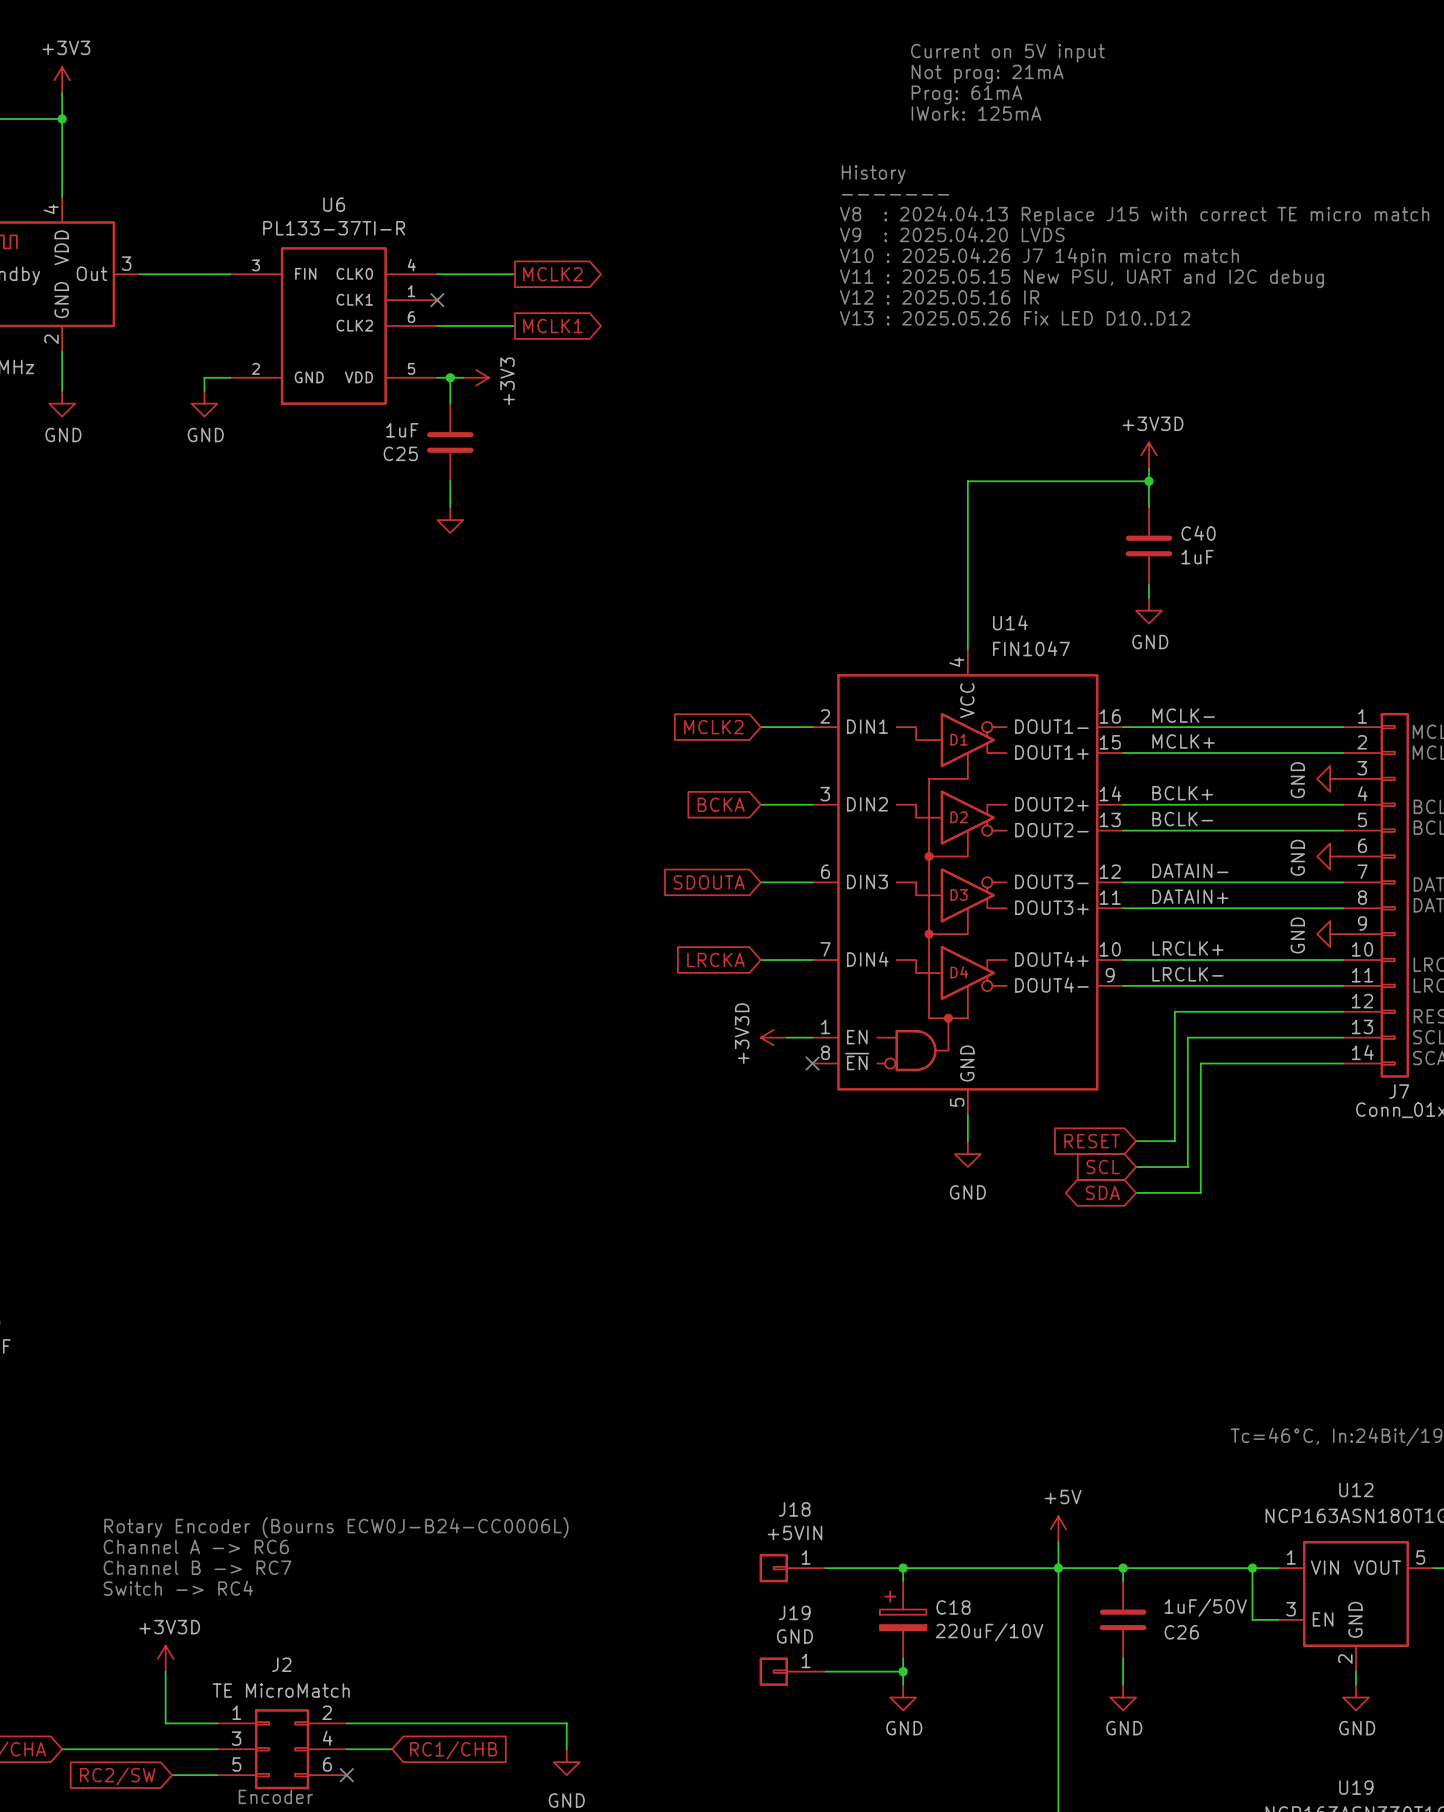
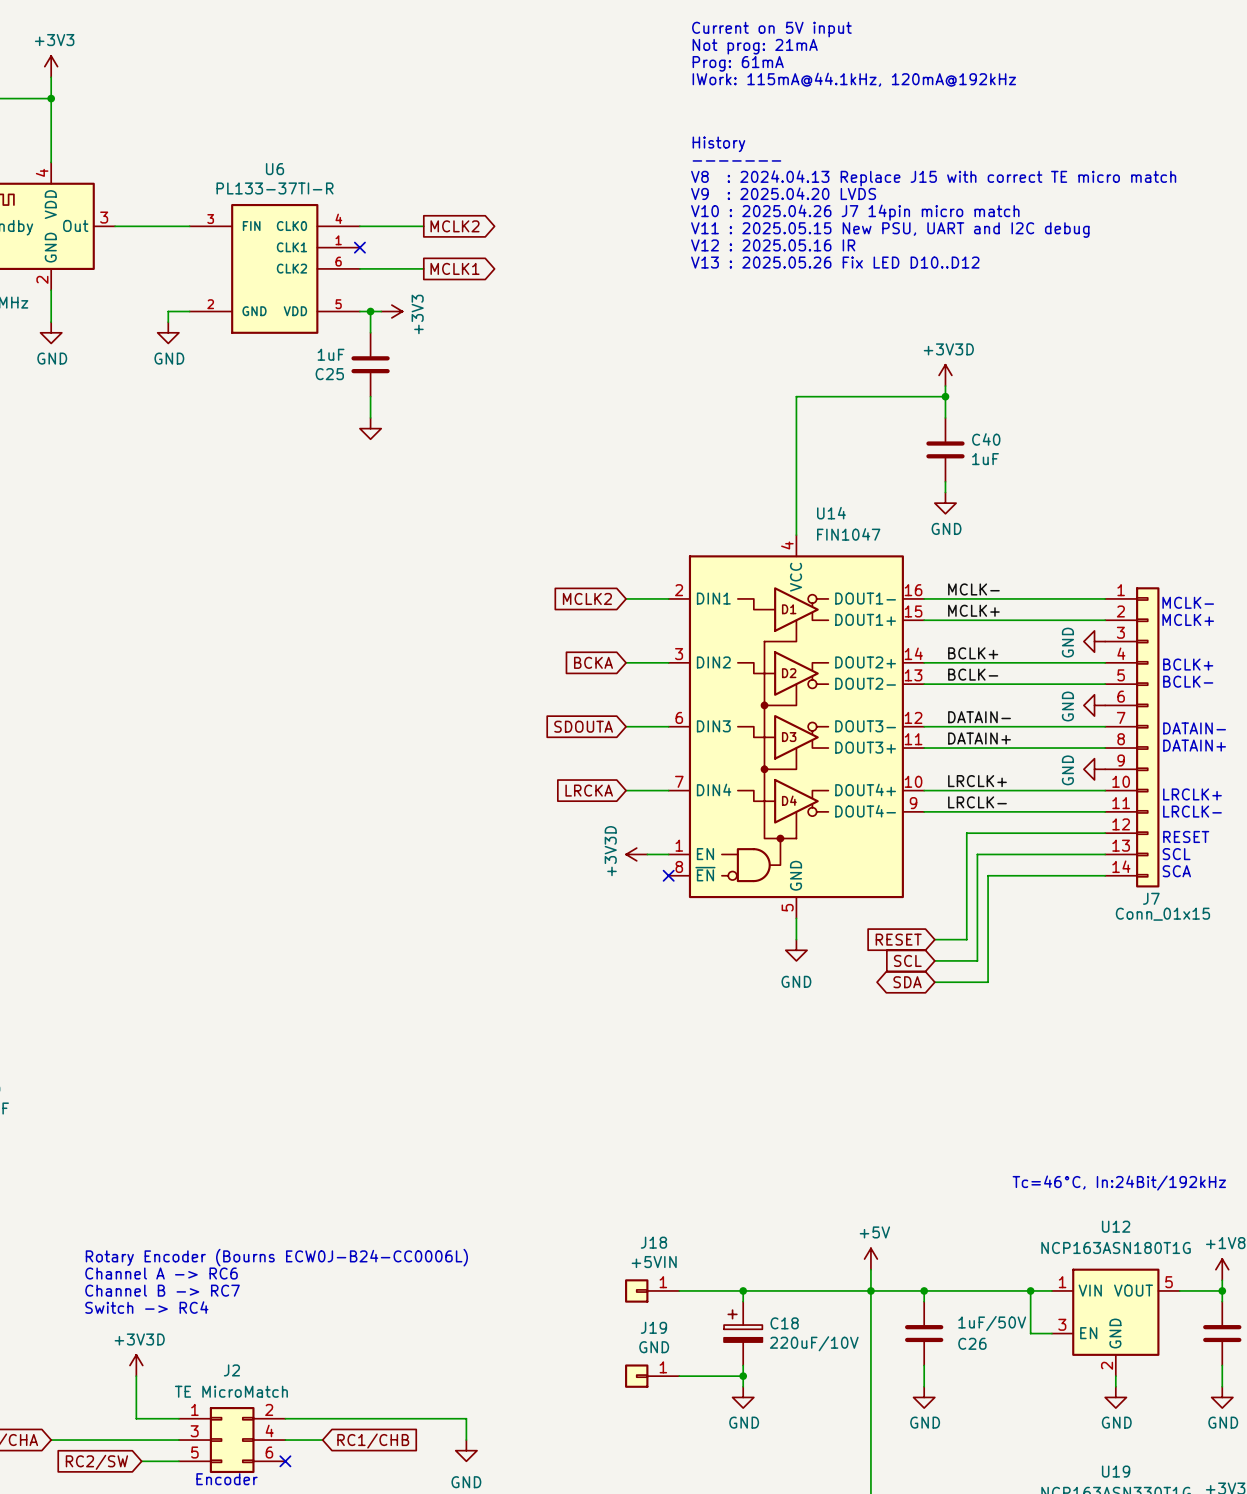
text position: Current on 5V input (1007, 53) -> Current on 5V input (771, 29)
text position: Not prog: 21mA (987, 74) -> Not prog: 21mA (755, 46)
text position: Prog: 61mA (966, 94) -> Prog: 61mA (738, 63)
text: none -> IWork: 115mA@44.1kHz, 120mA@192kHz (854, 79)
text: IWork: 125mA (976, 113) -> none

